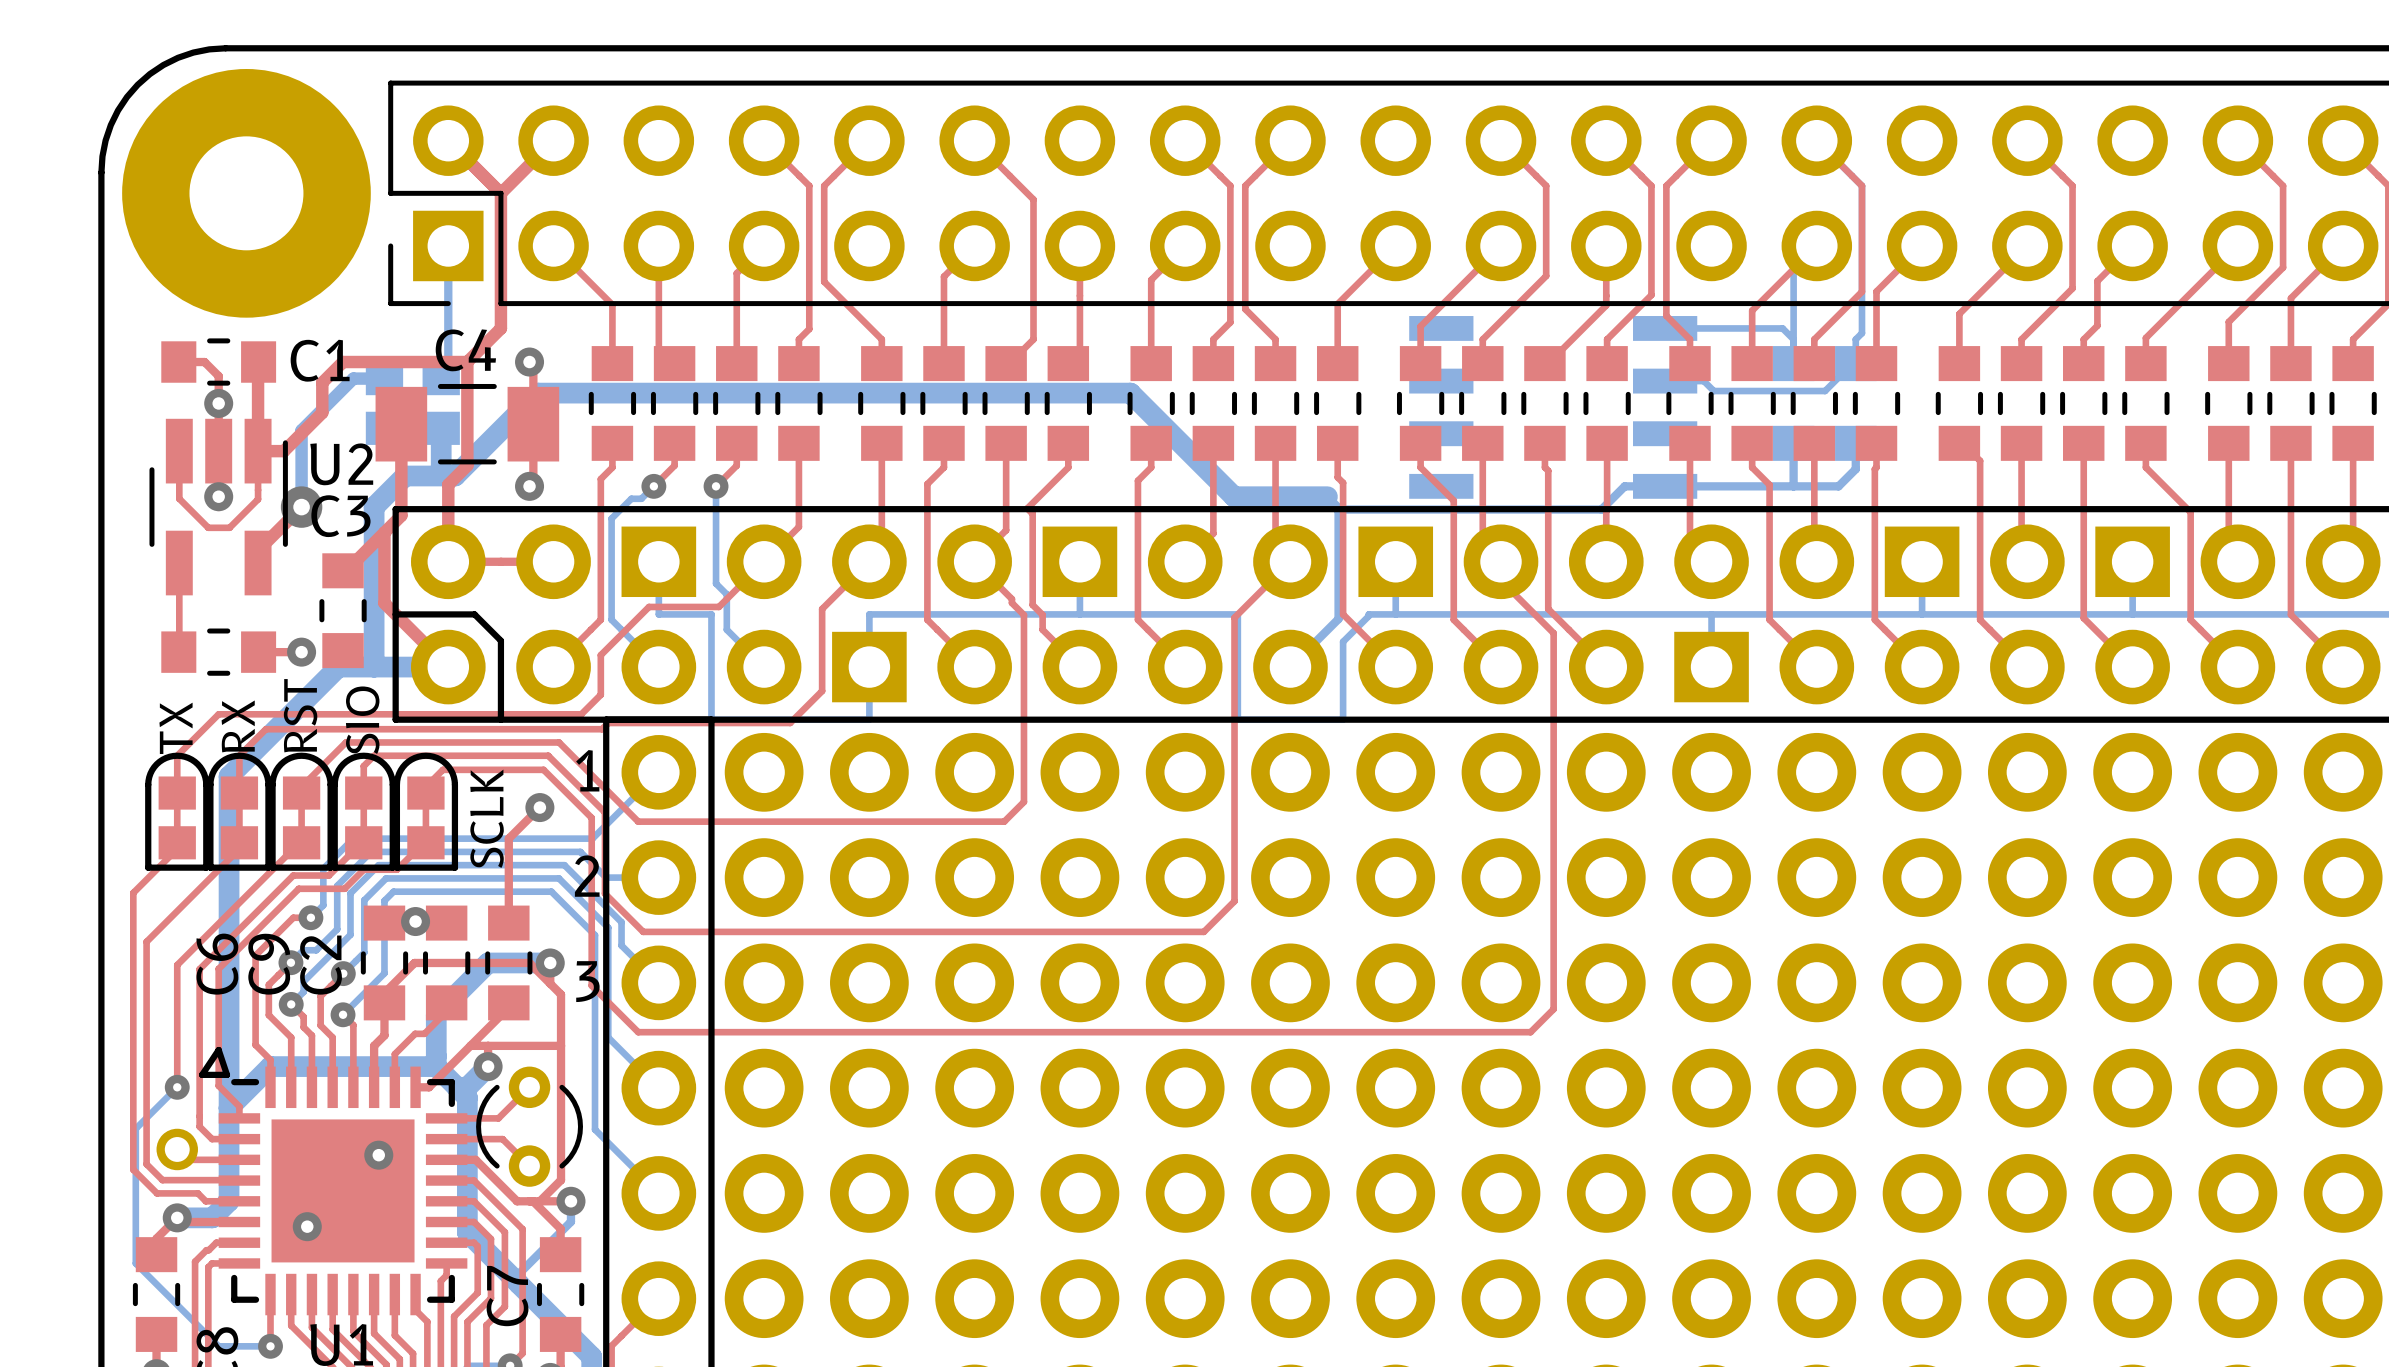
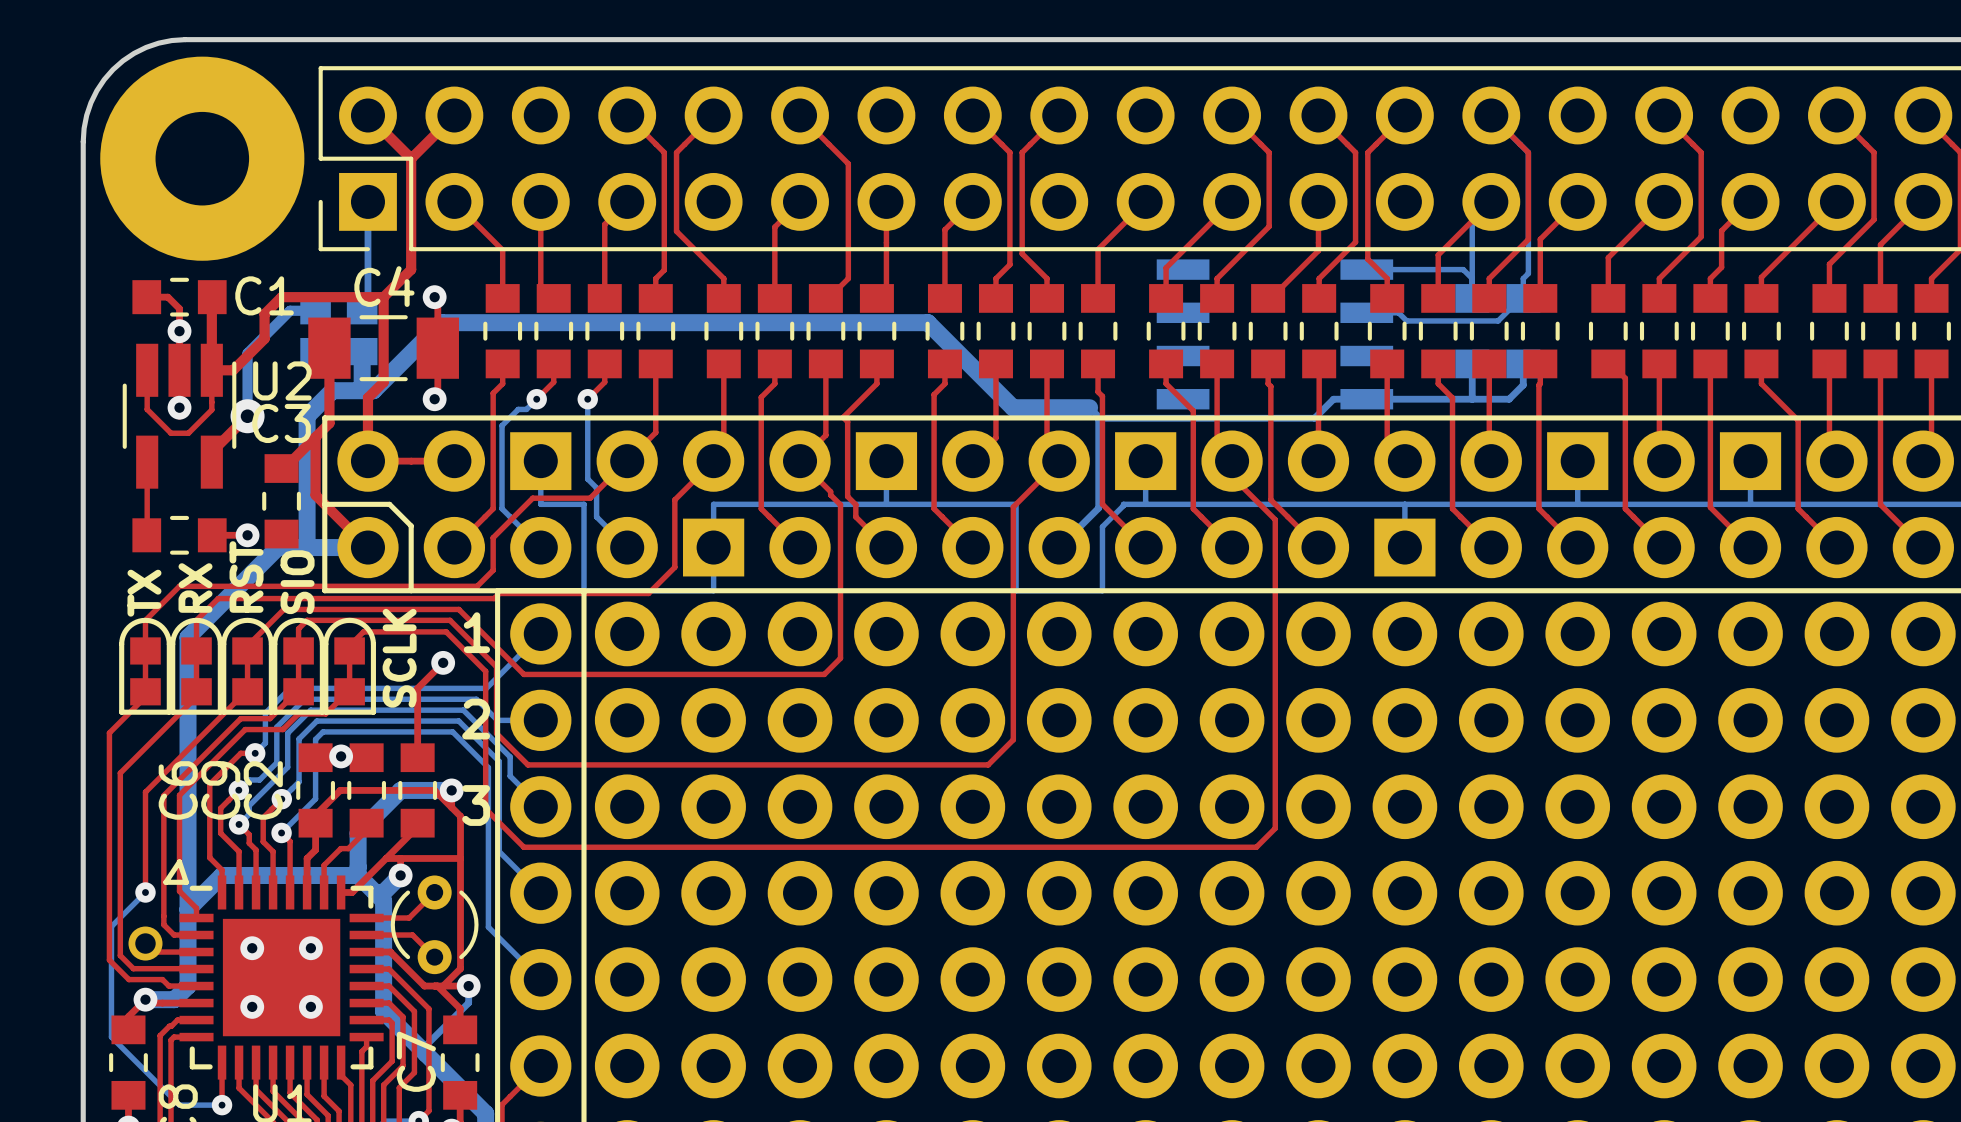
via: none -> (252, 948)
via: none -> (310, 1006)

